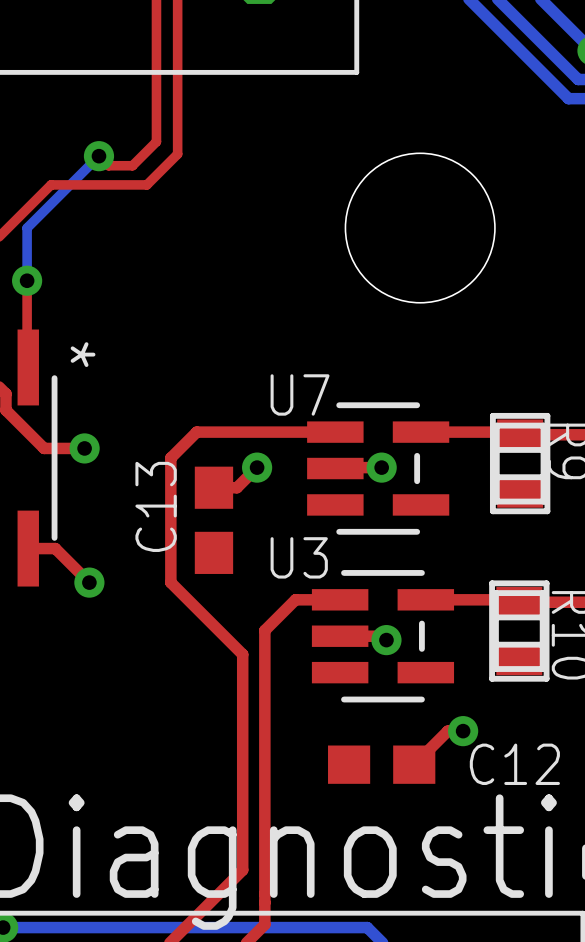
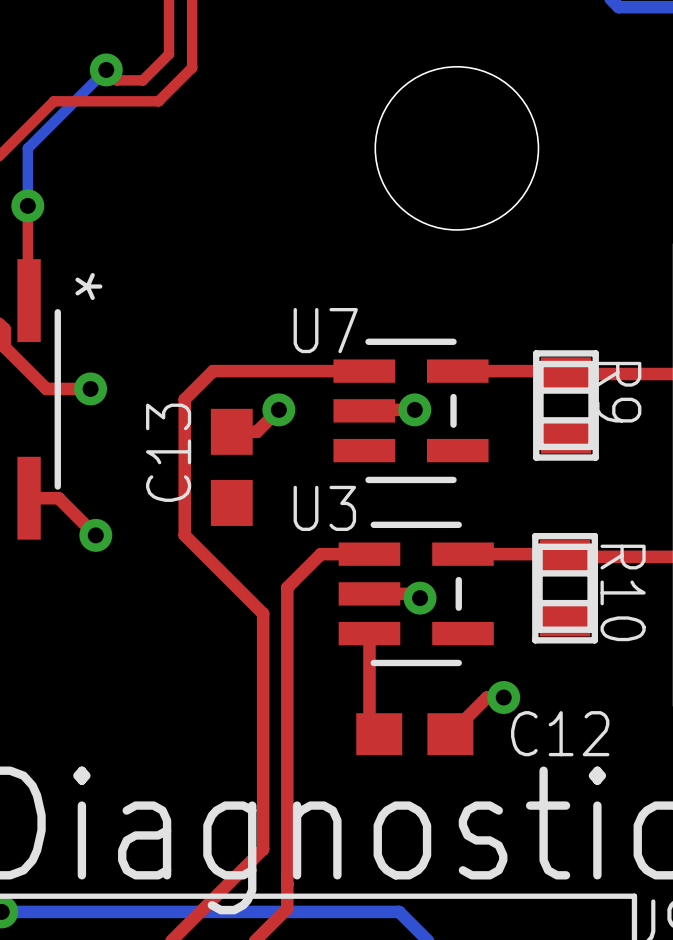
top track: none -> (369, 633) (369, 724) (379, 734)

